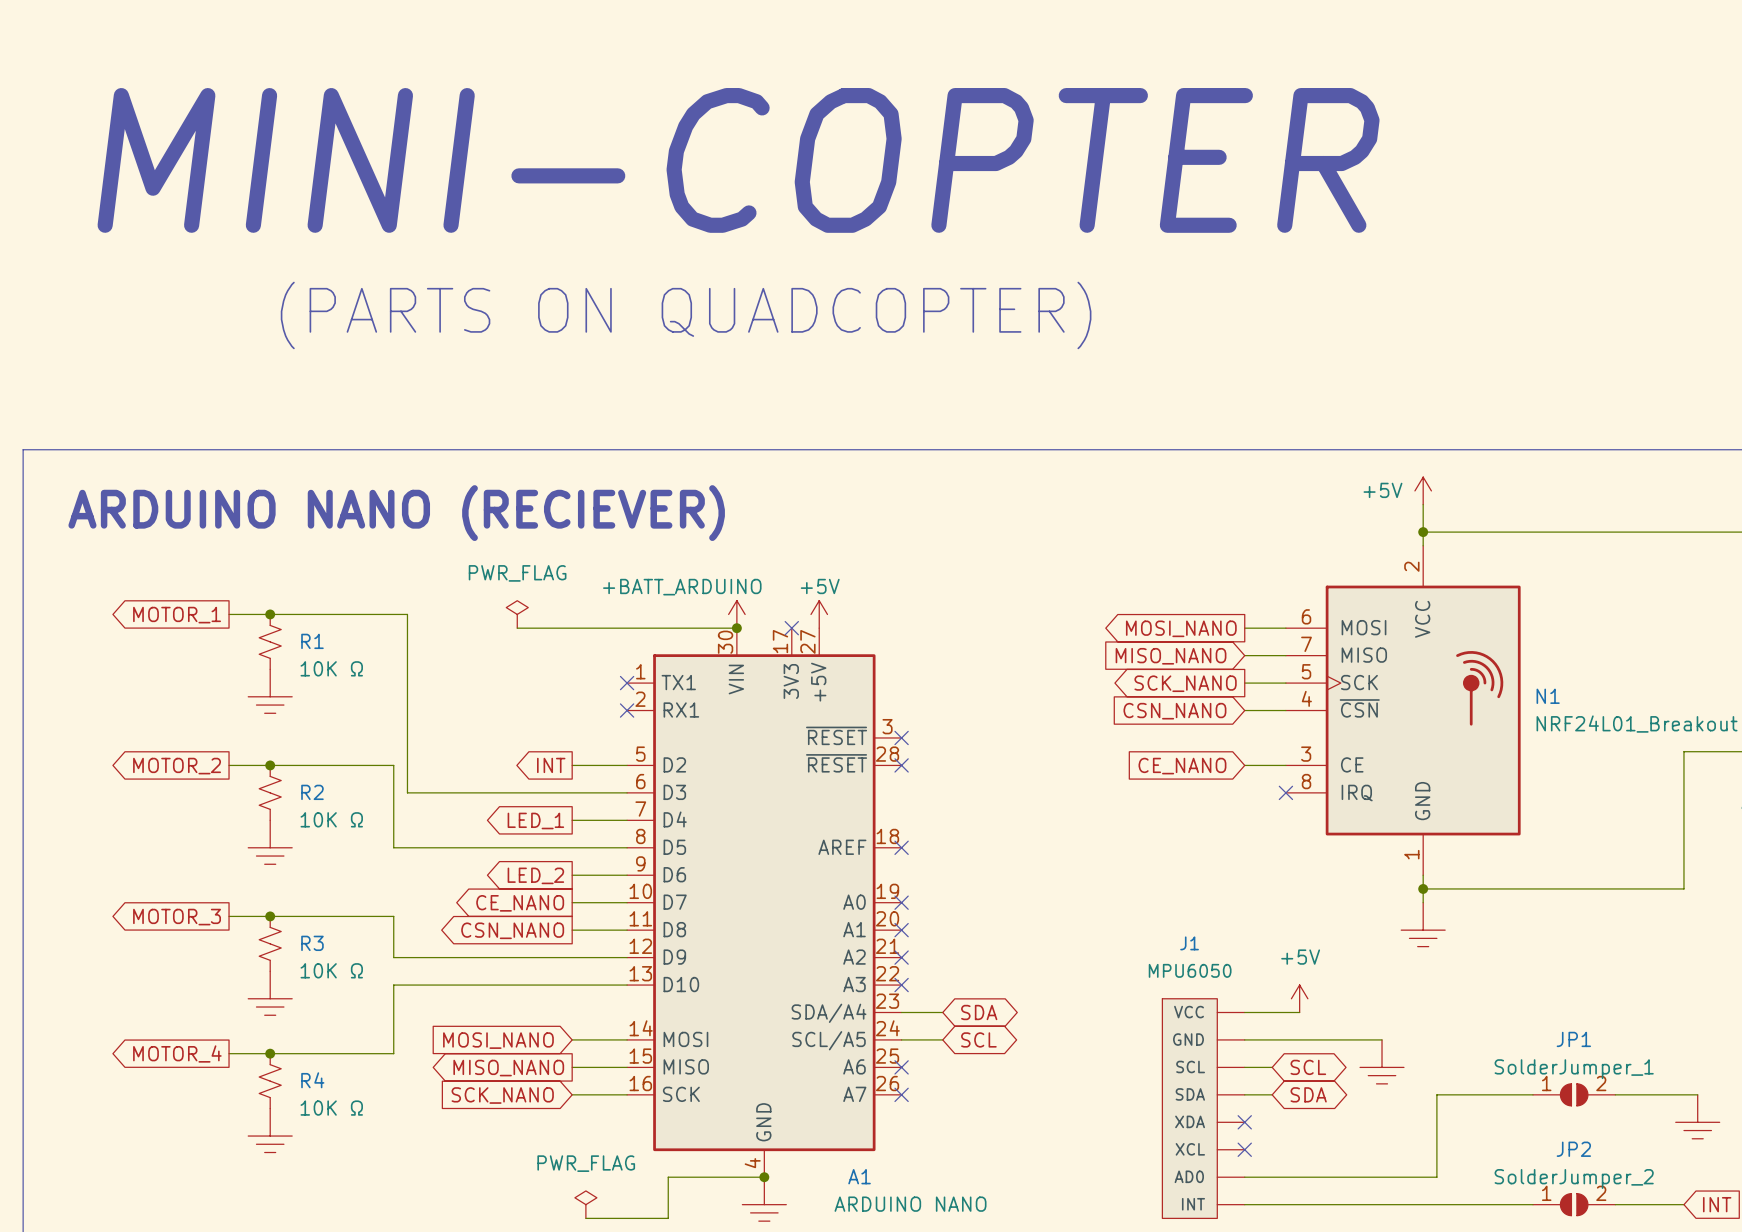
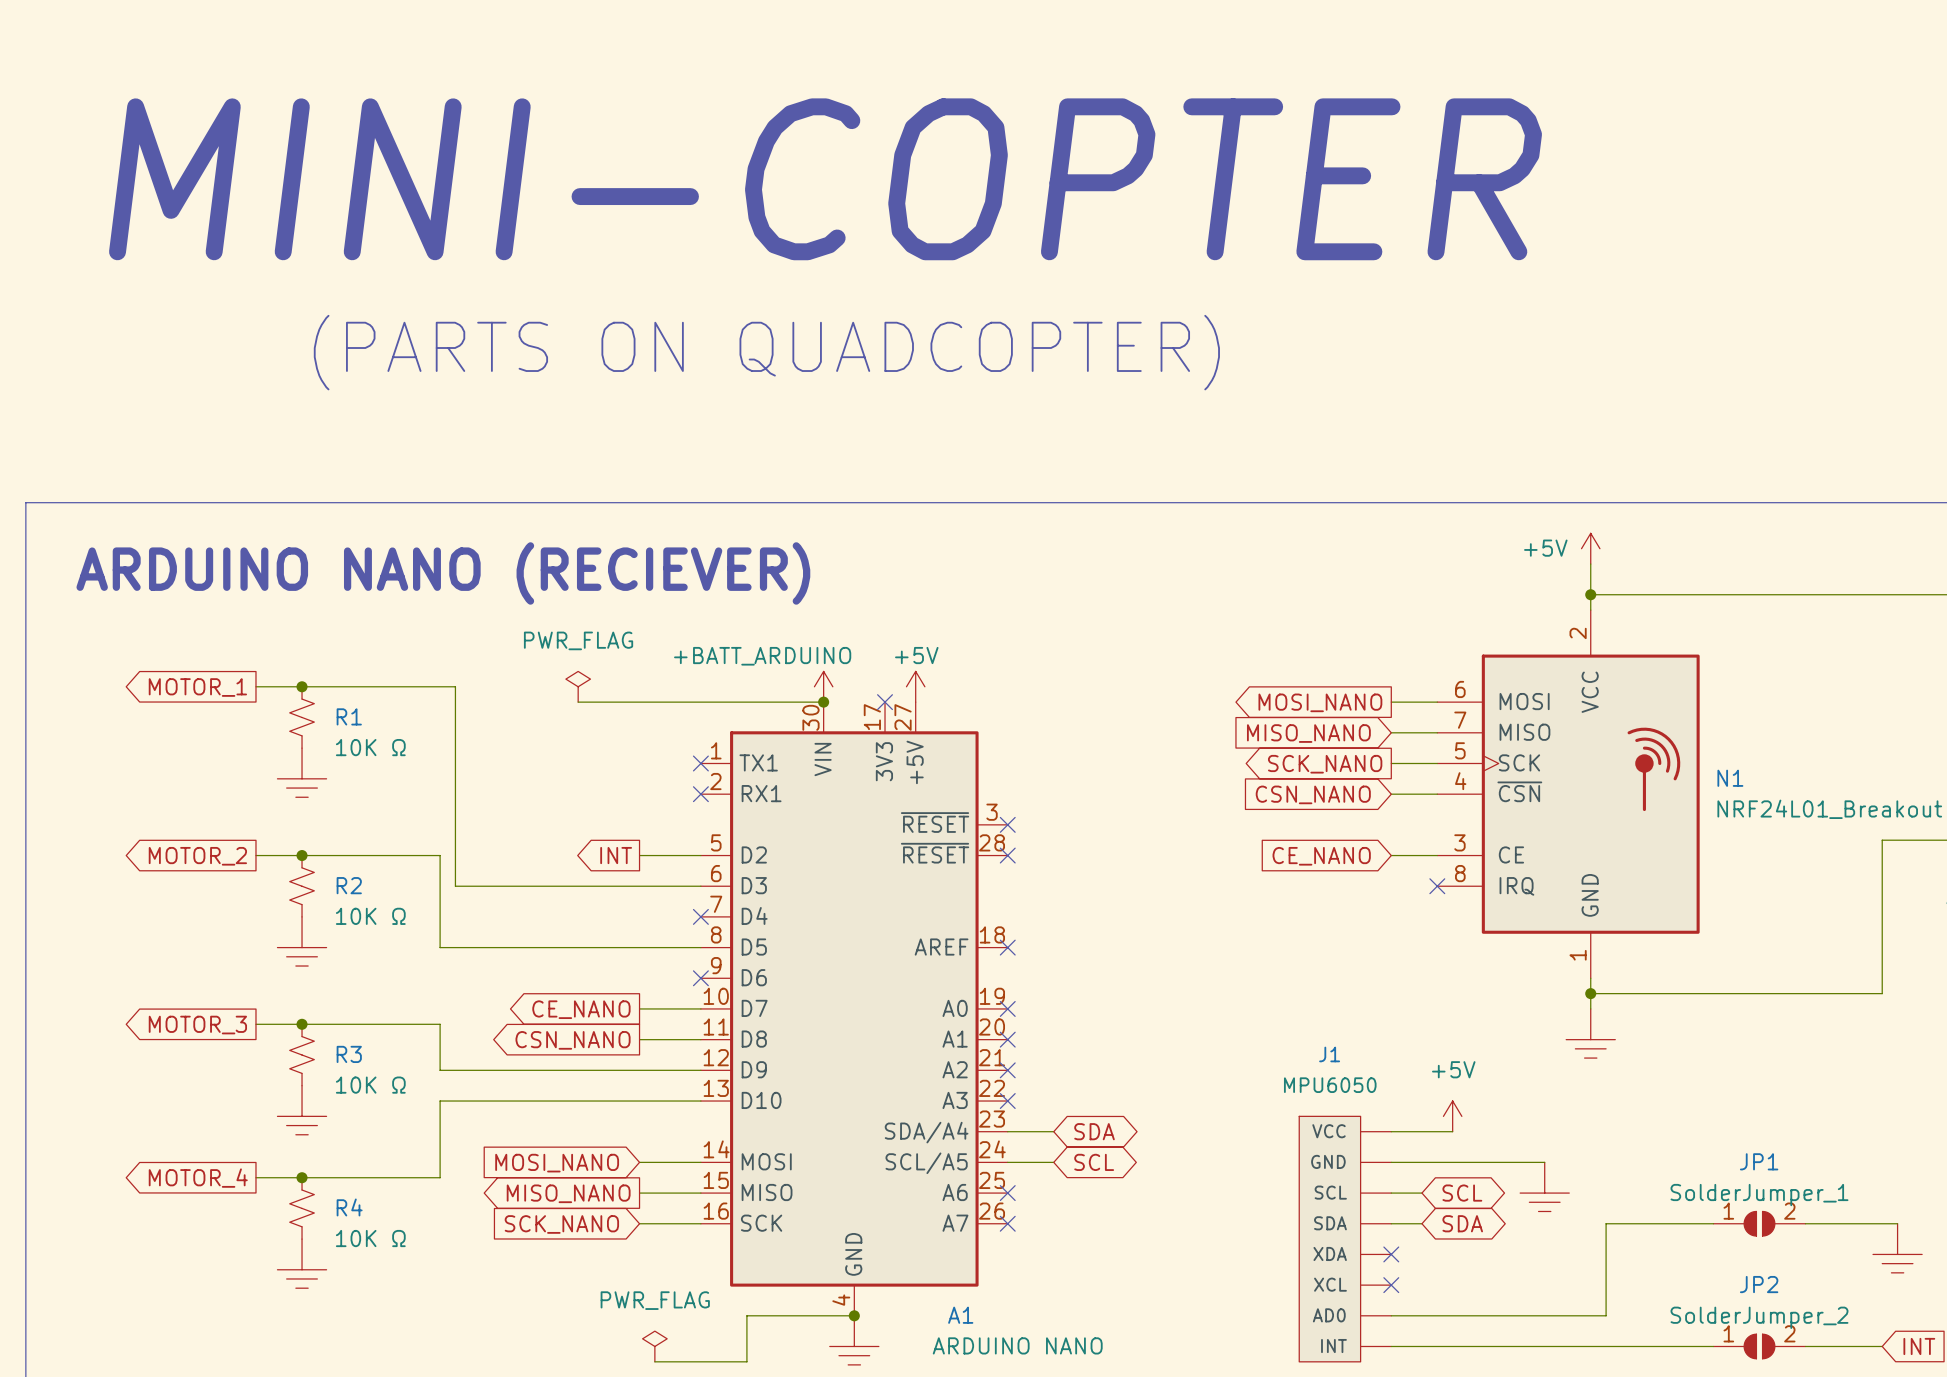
global label: LED_1 (535, 820) -> none
wire: (572, 820) (627, 820) -> none
no-connect mark: none -> (700, 916)
global label: LED_2 (535, 875) -> none
wire: (572, 875) (627, 875) -> none
no-connect mark: none -> (700, 978)

